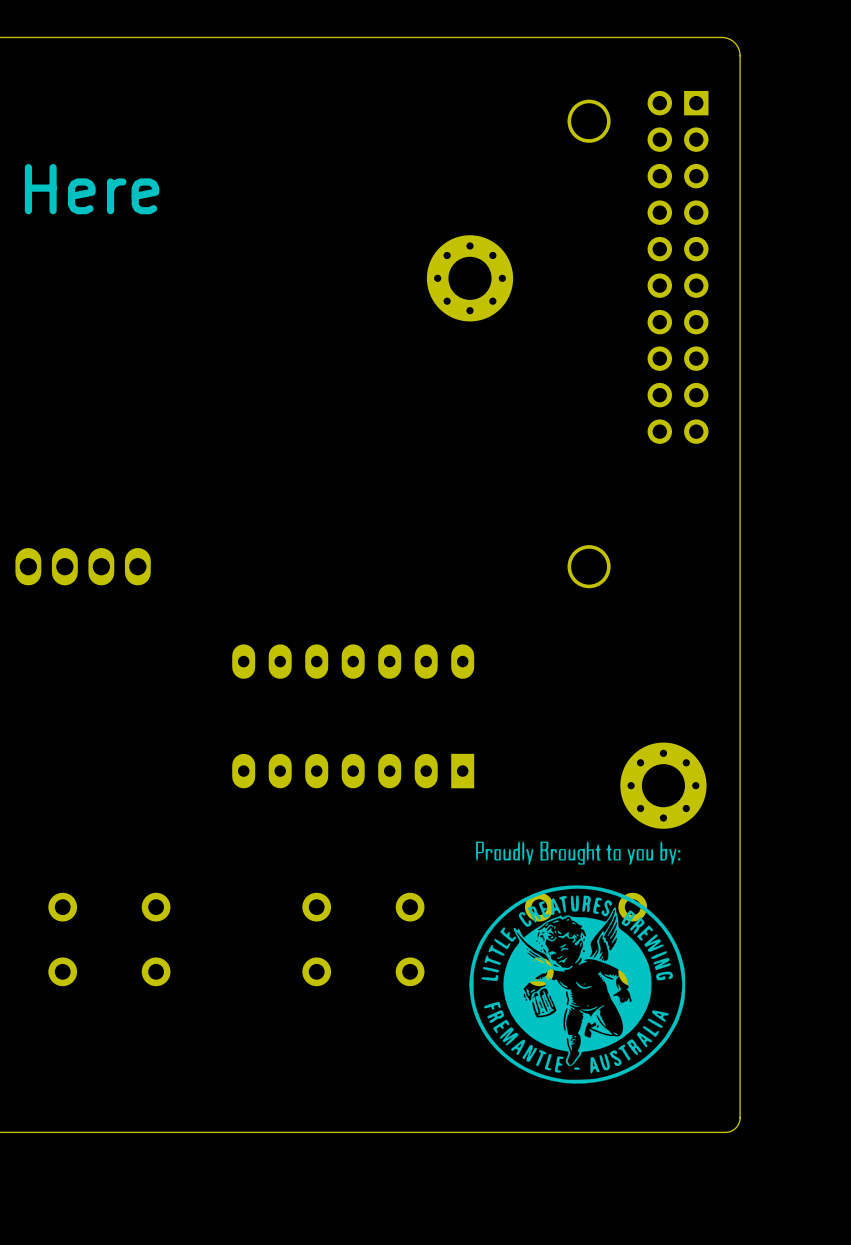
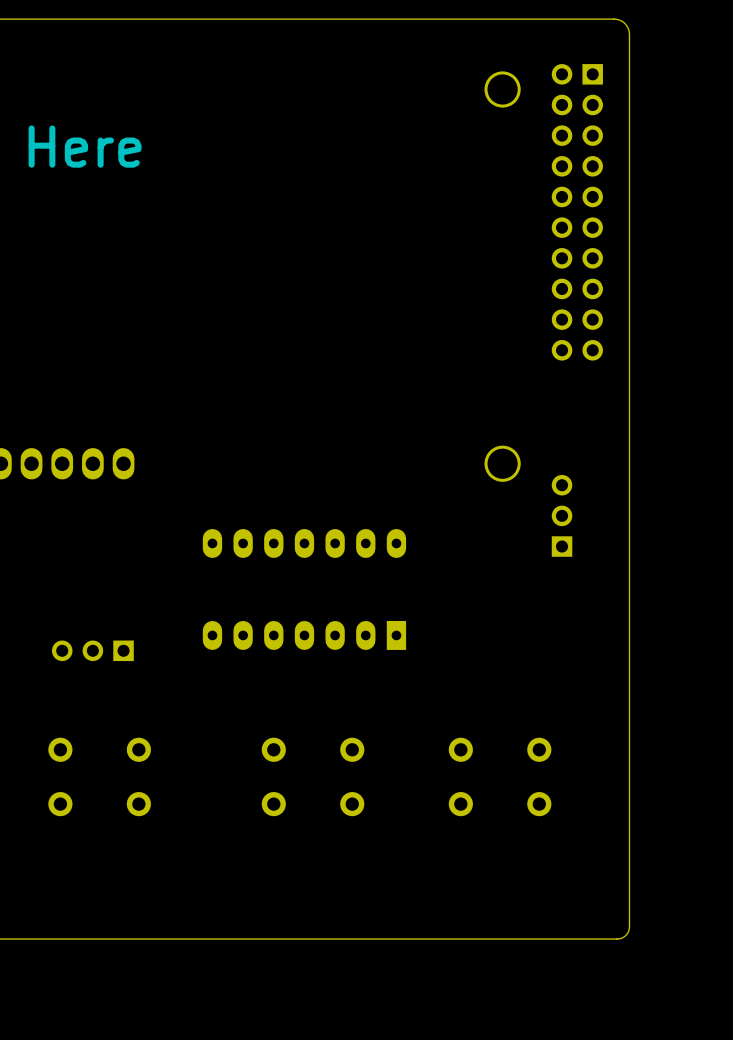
part: (469, 278) -> none
part: none -> (562, 515)
part: (663, 785) -> none
part: none -> (92, 650)
drawing: [469, 841, 686, 1084] -> none

